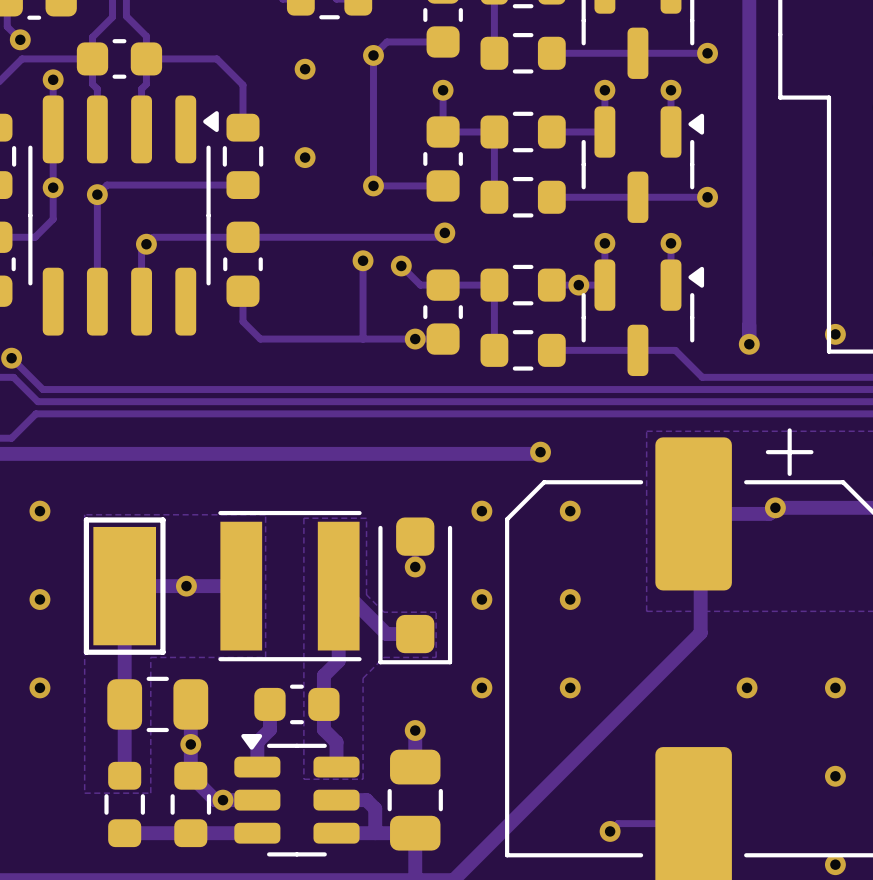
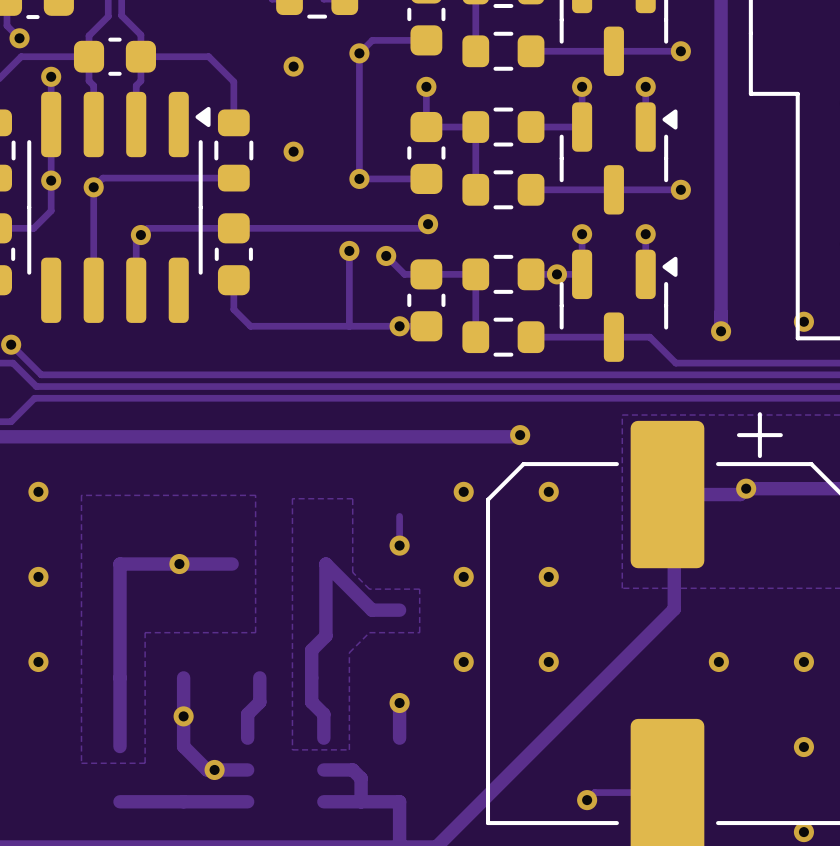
part: (124, 586) -> none
part: (289, 586) -> none
part: (415, 590) -> none
part: (157, 704) -> none
part: (296, 704) -> none
part: (296, 795) -> none
part: (415, 800) -> none
part: (124, 804) -> none
part: (190, 804) -> none

